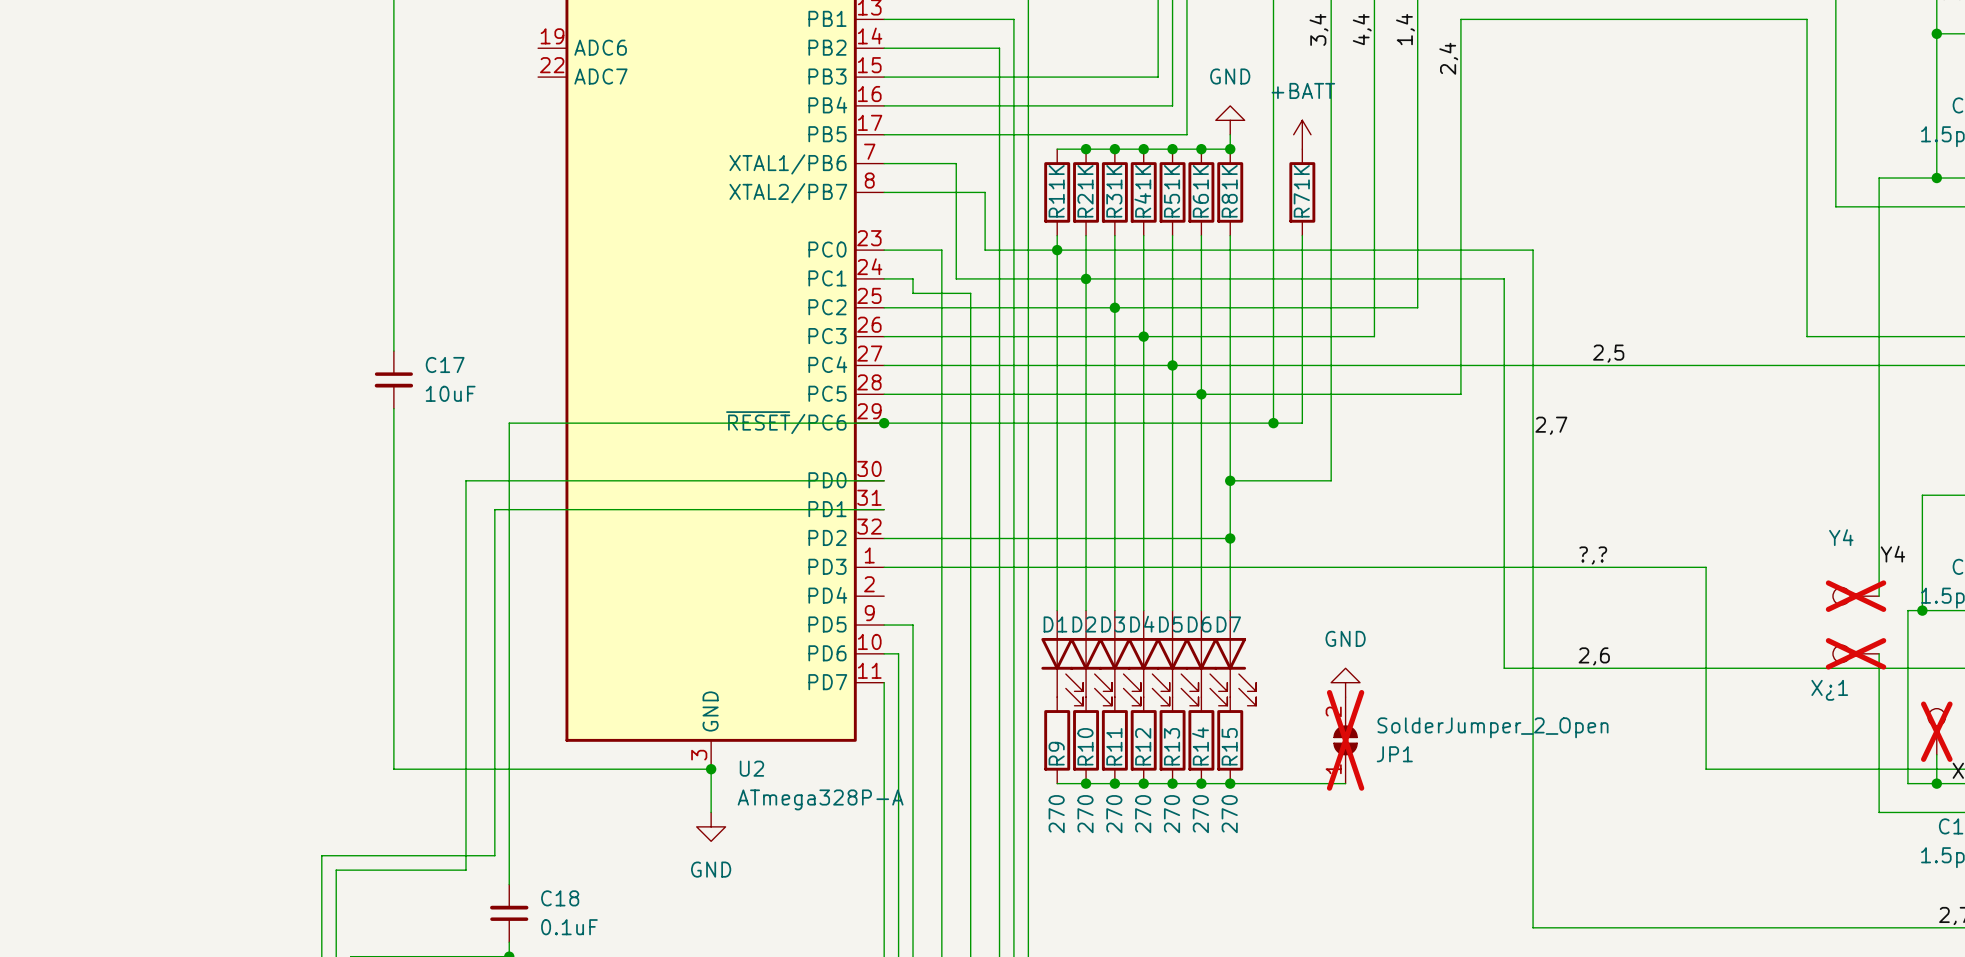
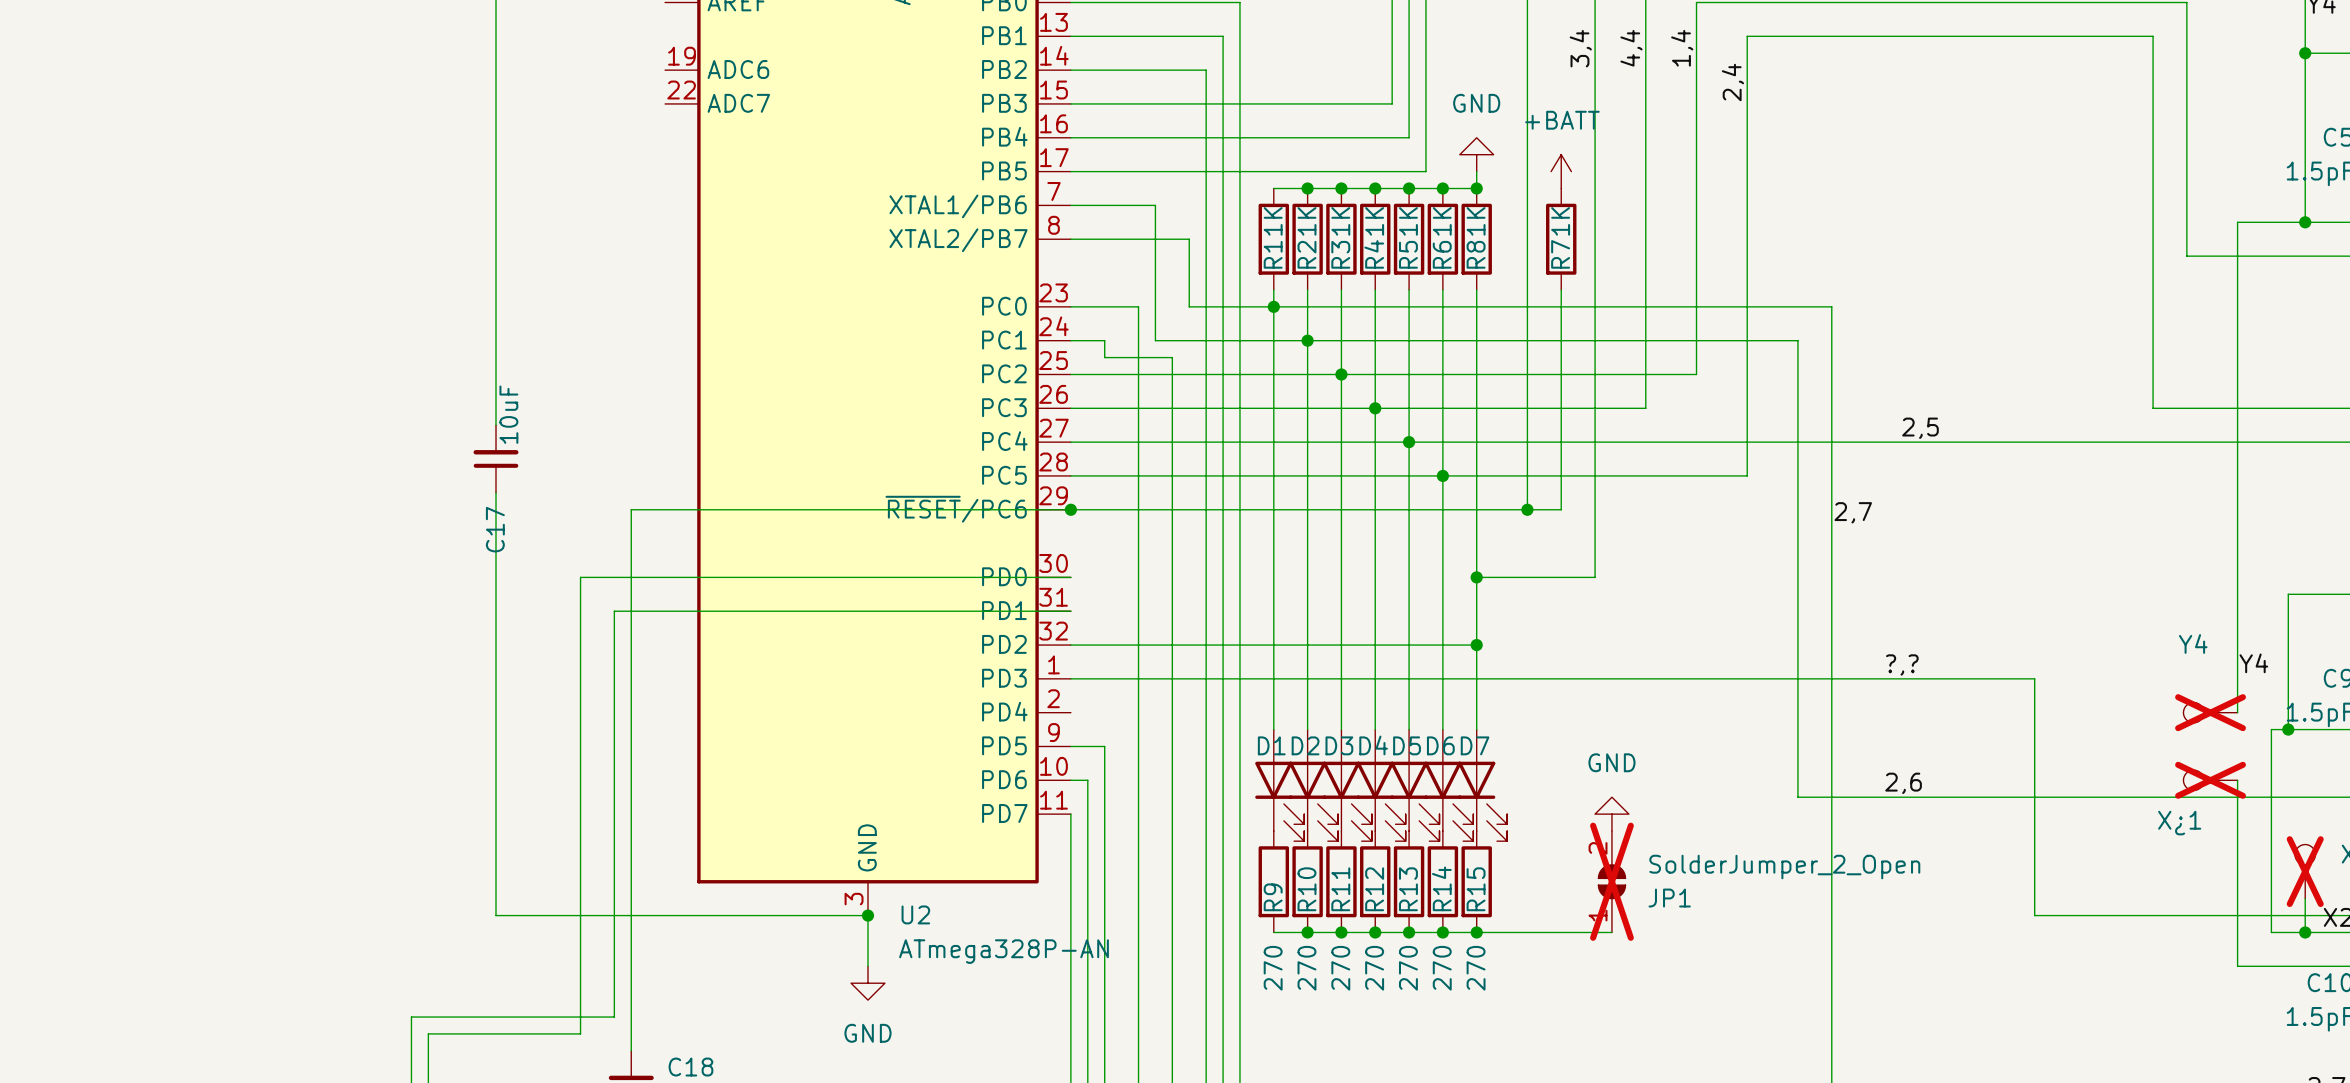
C17 name position: C17 (445, 364) -> C17 (495, 529)
C17 rotation: 0° (393, 379) -> 180° (495, 458)
C17 value position: 10uF (450, 393) -> 10uF (508, 414)
U2 value: ATmega328P-A (820, 799) -> ATmega328P-AN (1004, 951)

